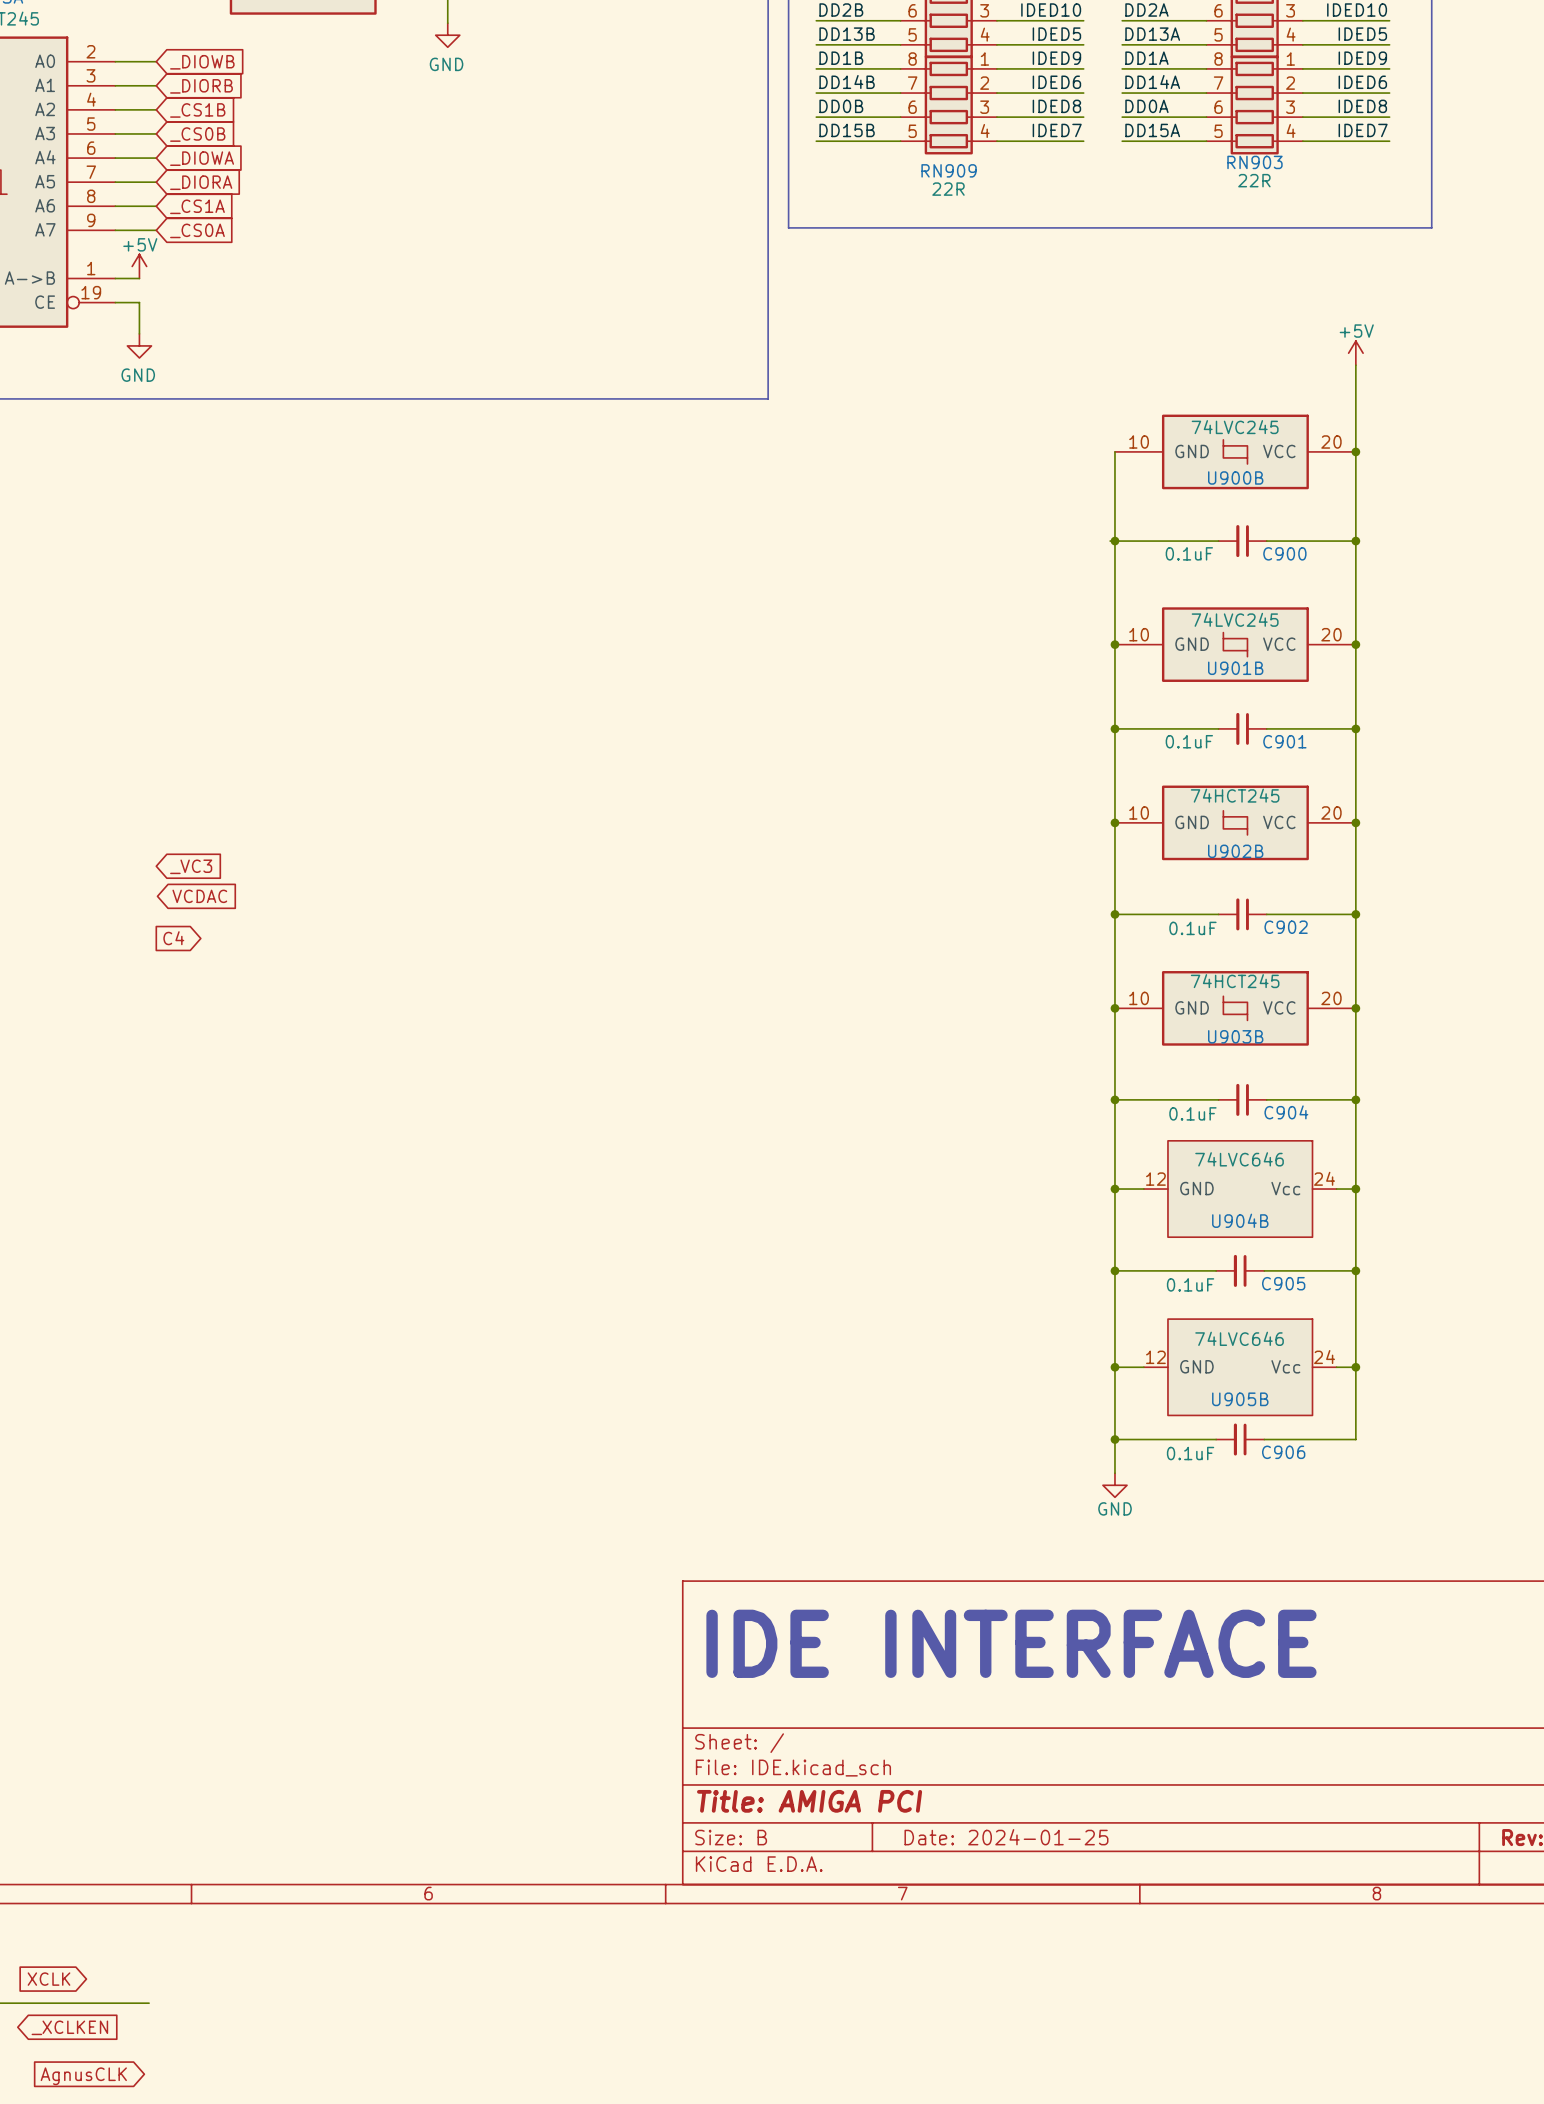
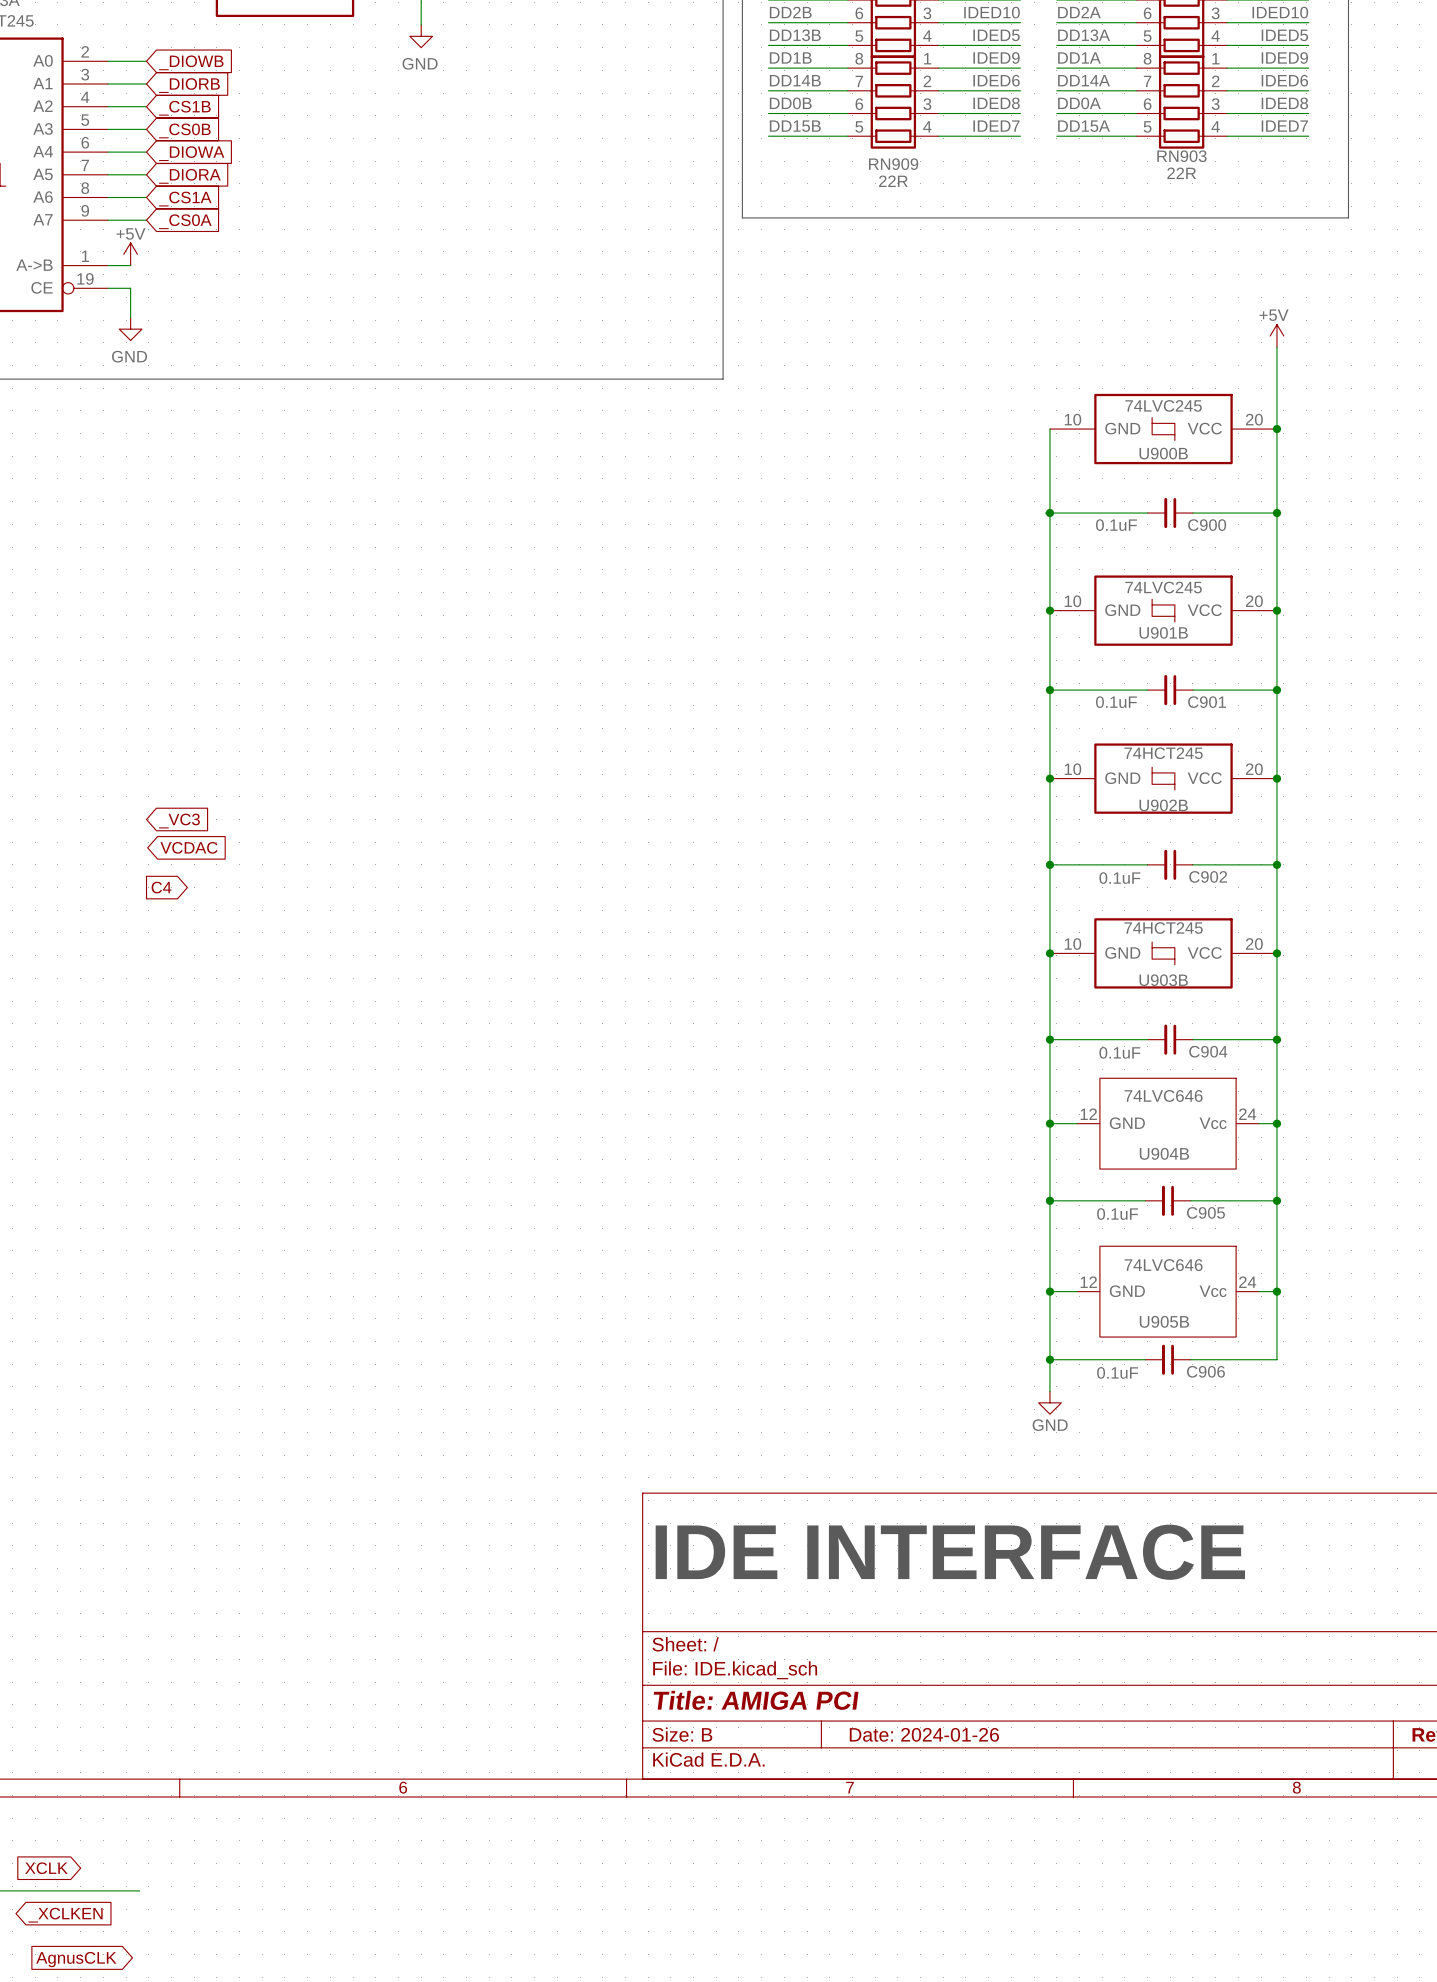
title block: Date: 2024-01-25 (1006, 1837) -> Date: 2024-01-26 (924, 1734)

